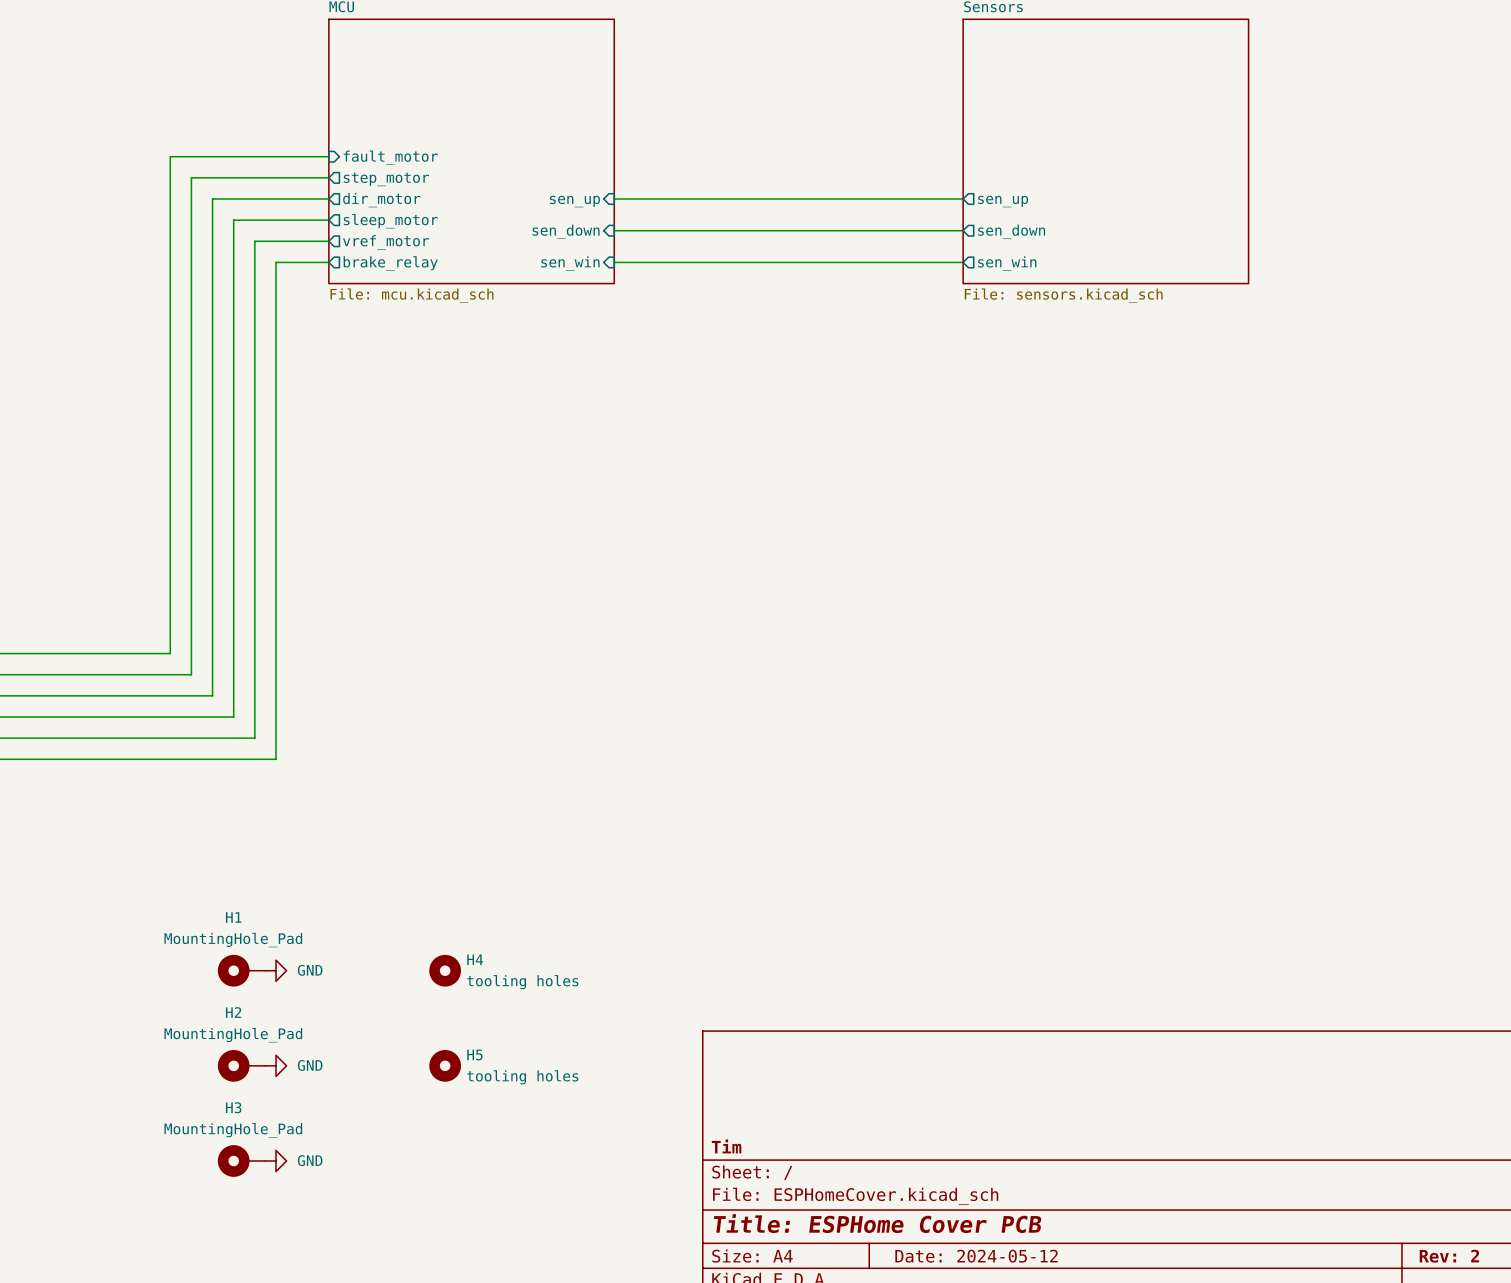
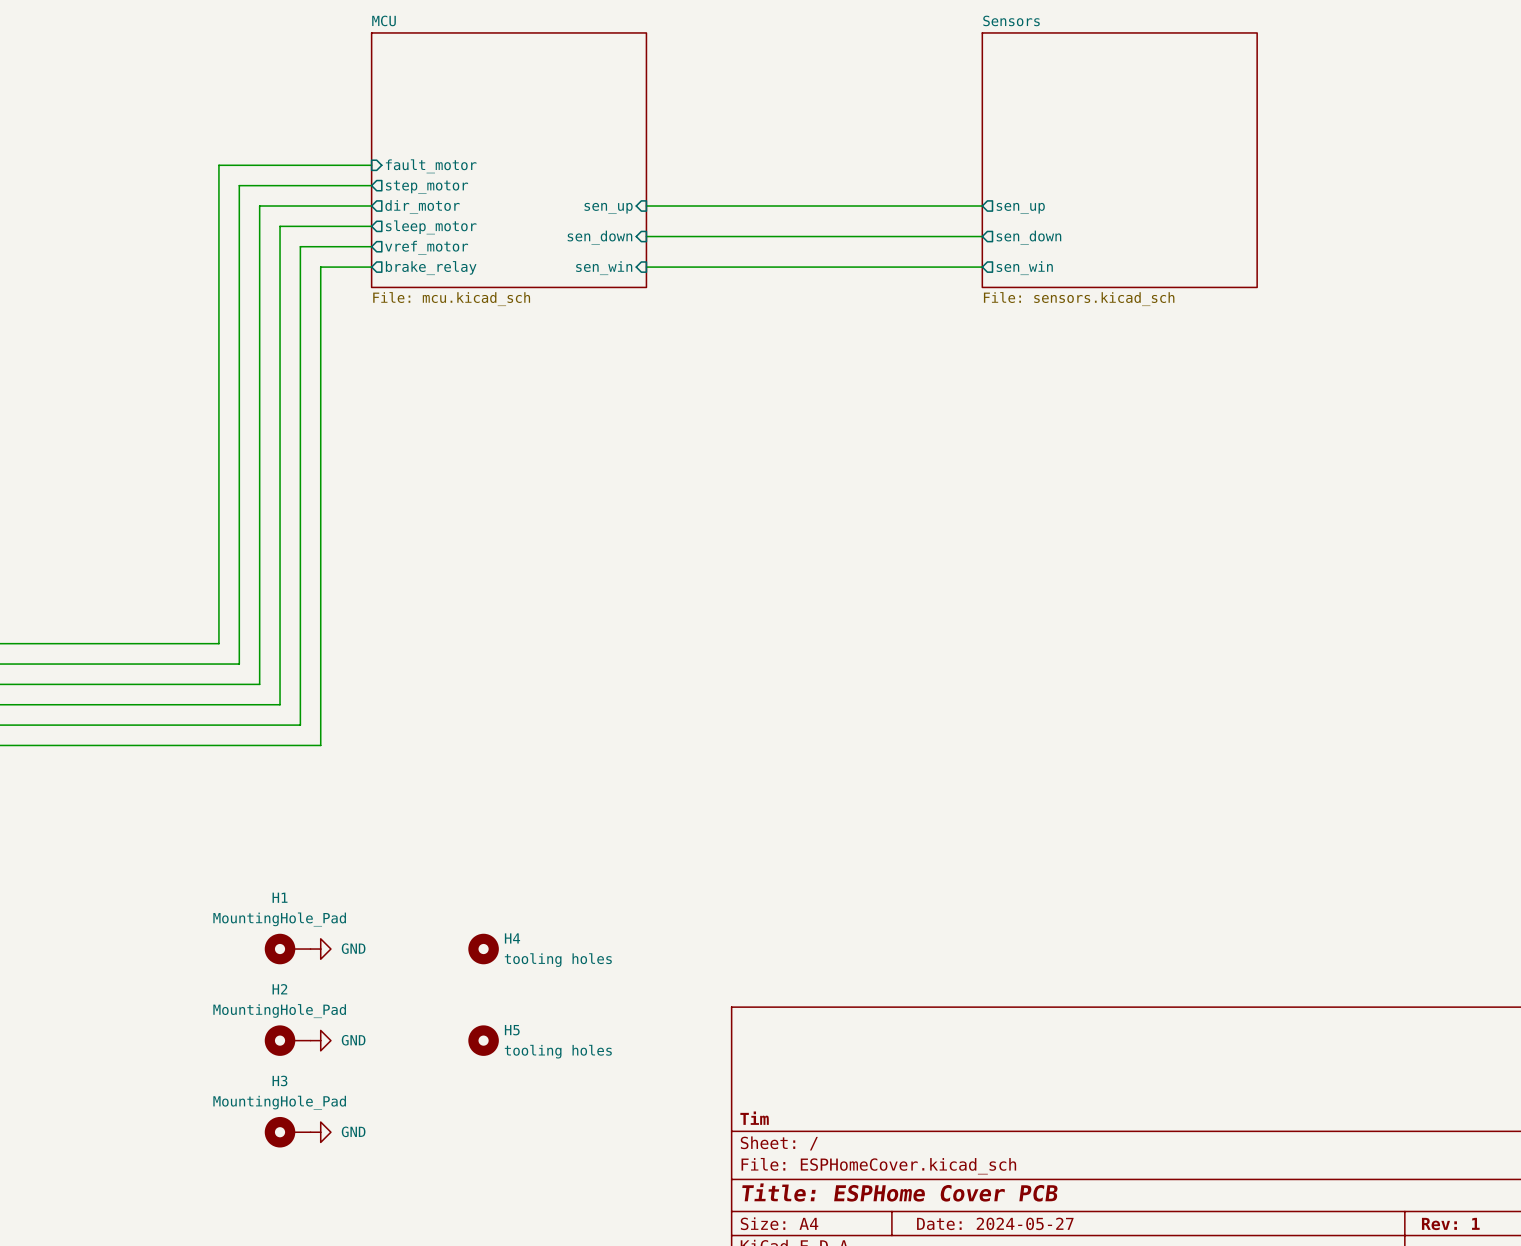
title block: Date: 2024-05-12 (976, 1256) -> Date: 2024-05-27 (995, 1223)
title block: Rev: 2 (1449, 1256) -> Rev: 1 (1450, 1223)

